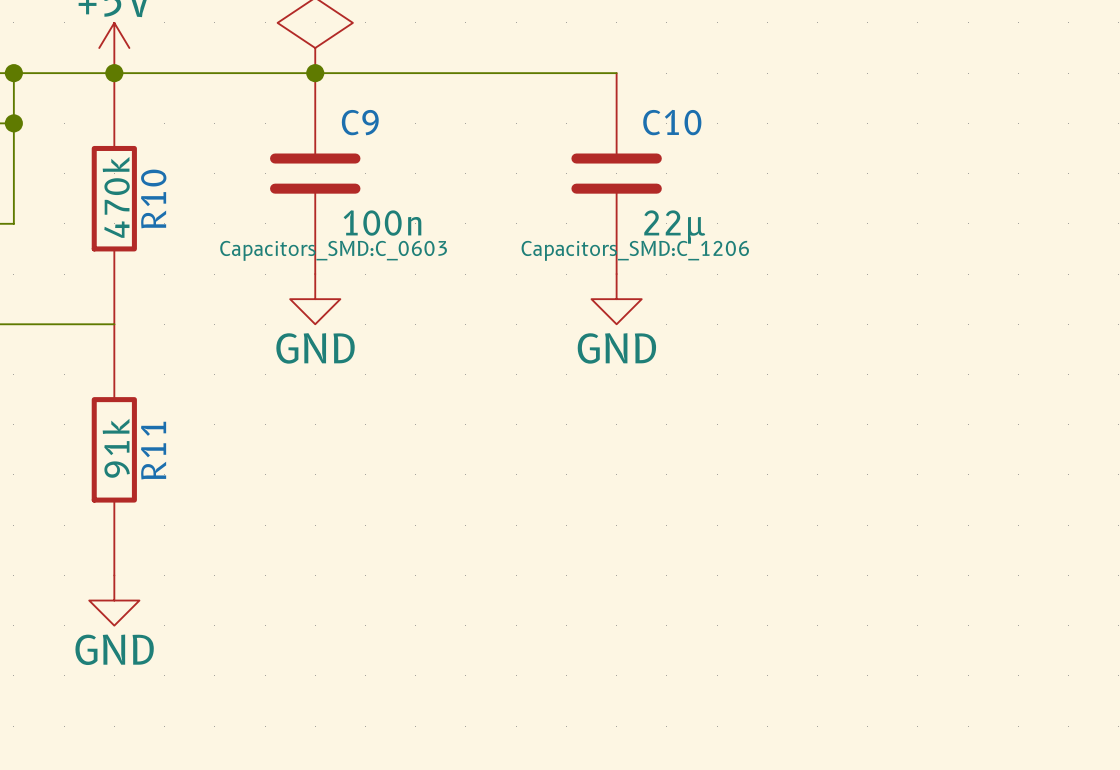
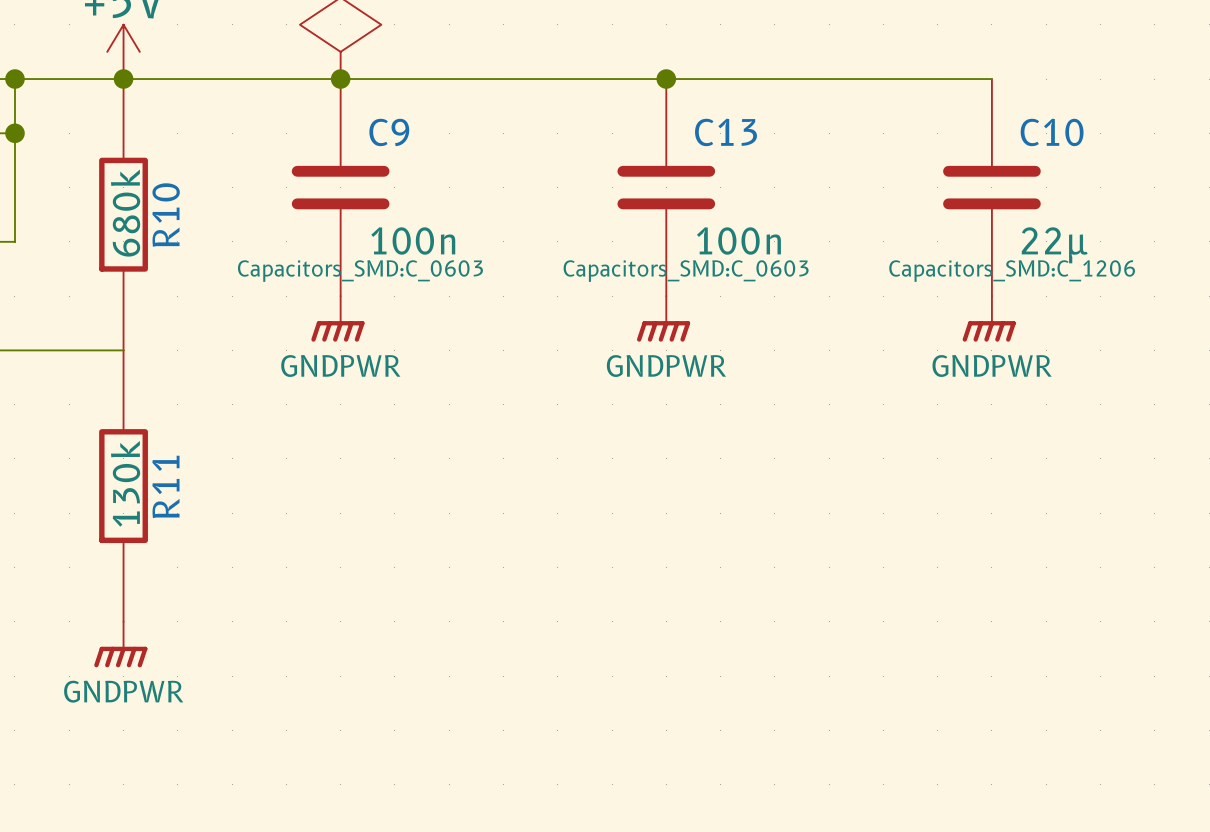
wire: none -> (666, 79) (991, 79)
junction: none -> (666, 79)
C10 name: C10 (672, 122) -> C13 (725, 132)
C10: none -> 22µ (991, 187)
R10 value: 470k (116, 197) -> 680k (125, 213)
C10 value: 22µ (674, 227) -> 100n (738, 240)
C10 text: Capacitors_SMD:C_1206 (635, 250) -> Capacitors_SMD:C_0603 (686, 271)
power symbol: none -> GNDPWR (989, 318)
power symbol: GND (315, 299) -> GNDPWR (337, 318)
power symbol: GND (616, 299) -> GNDPWR (663, 318)
R11 value: 91k (116, 448) -> 130k (125, 483)
power symbol: GND (114, 600) -> GNDPWR (120, 644)

